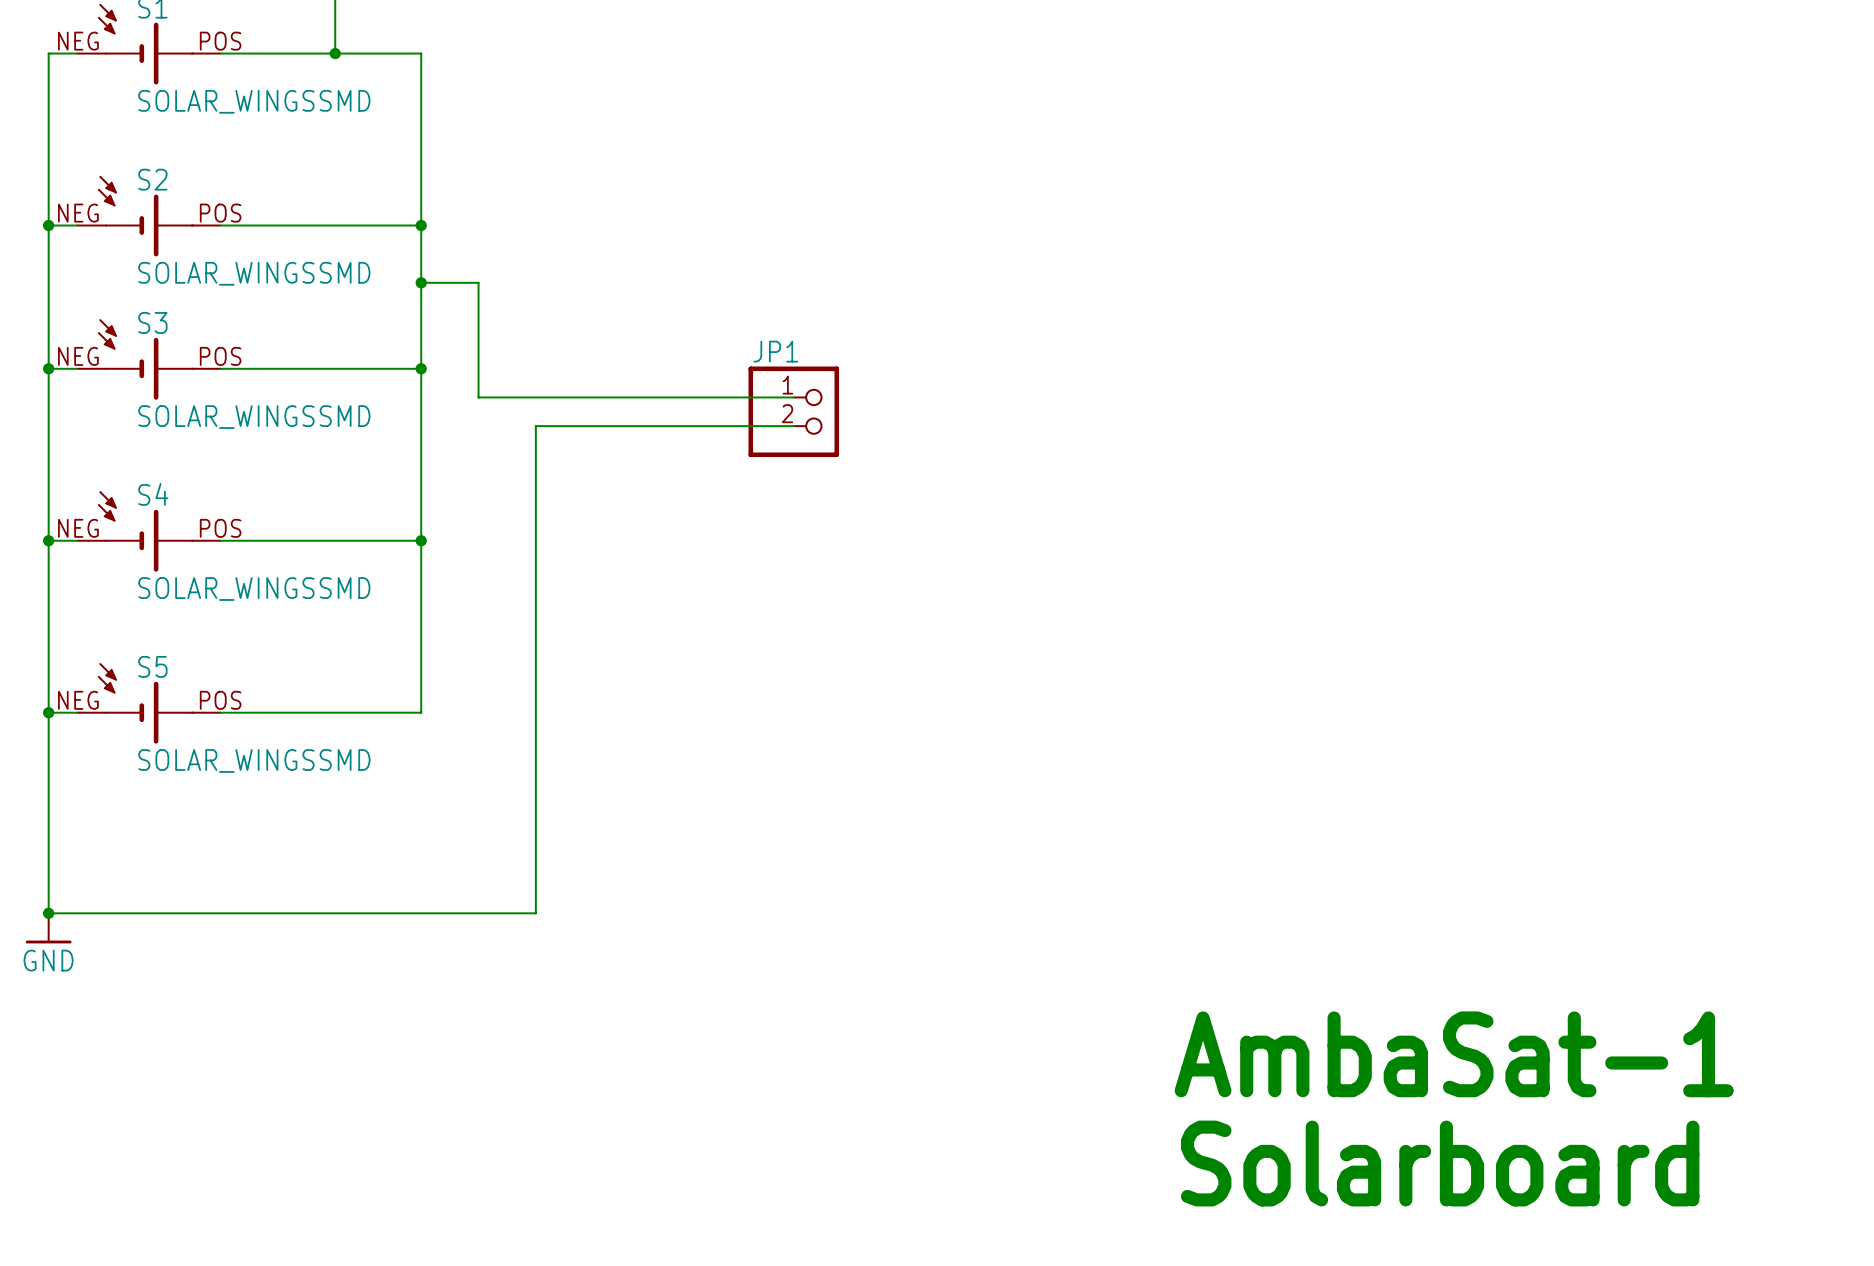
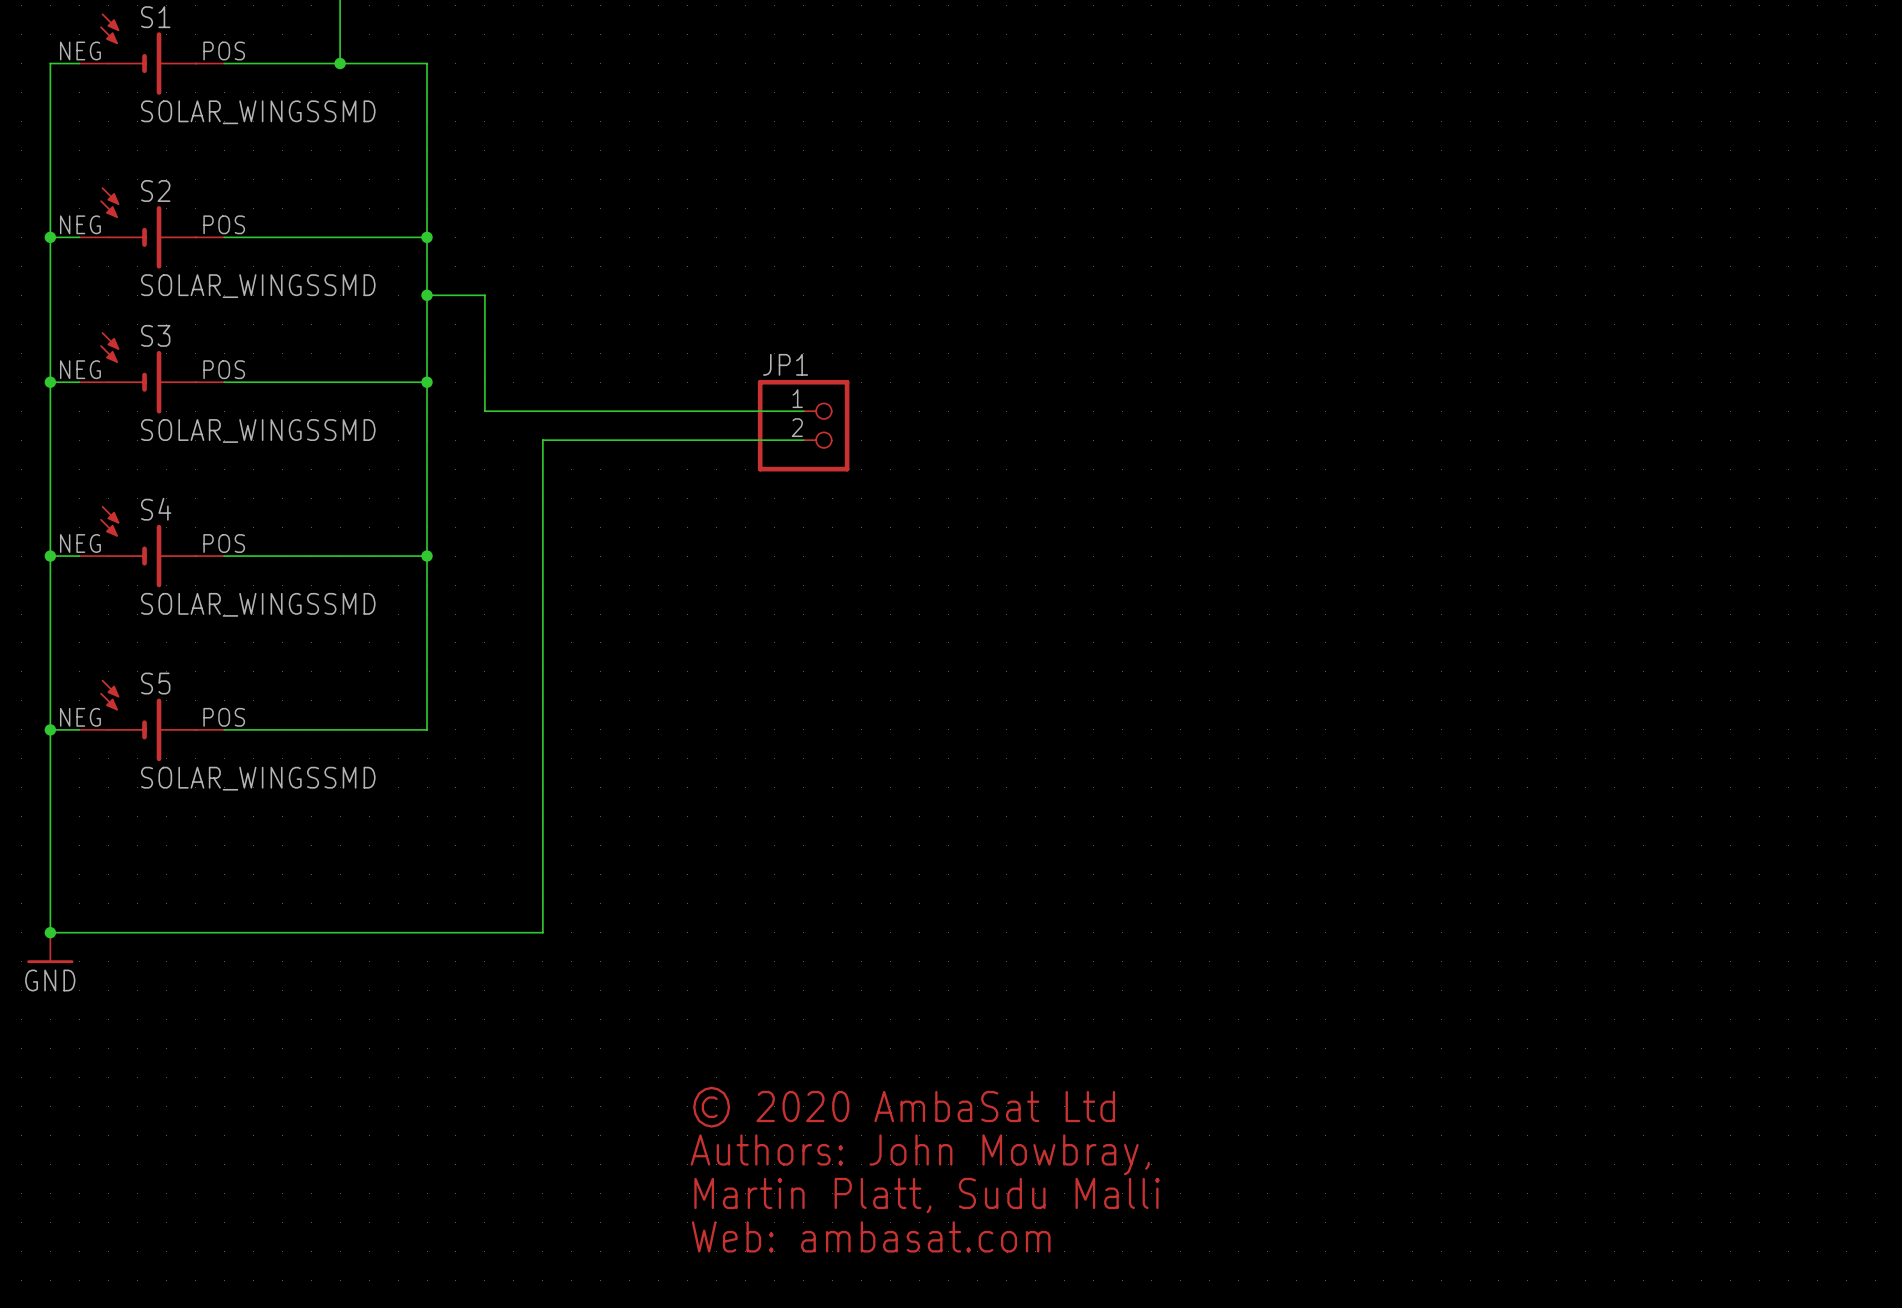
text: AmbaSat-1 (1454, 1054) -> none
text: none -> © 2020 AmbaSat Ltd (904, 1107)
text: none -> Authors: John Mowbray, (920, 1154)
text: Solarboard (1440, 1163) -> none
text: none -> Martin Platt, Sudu Malli (927, 1195)
text: none -> Web: ambasat.com (871, 1236)

